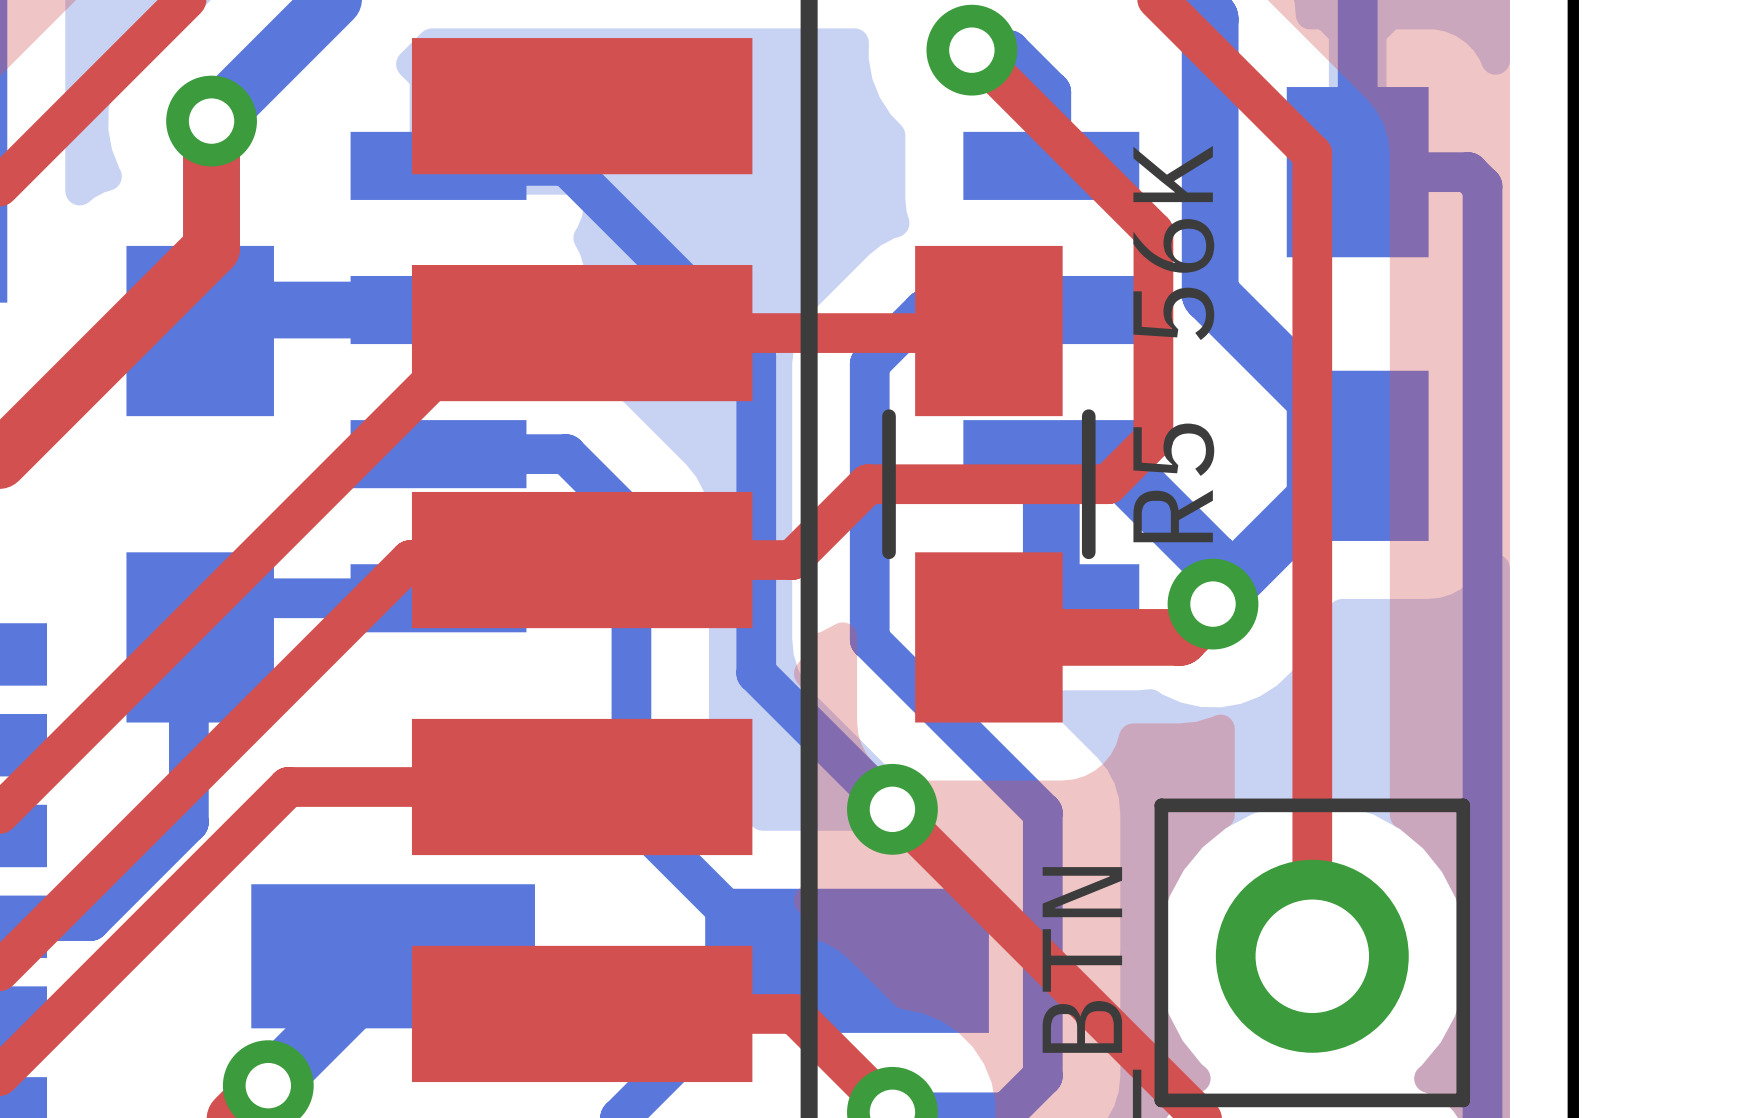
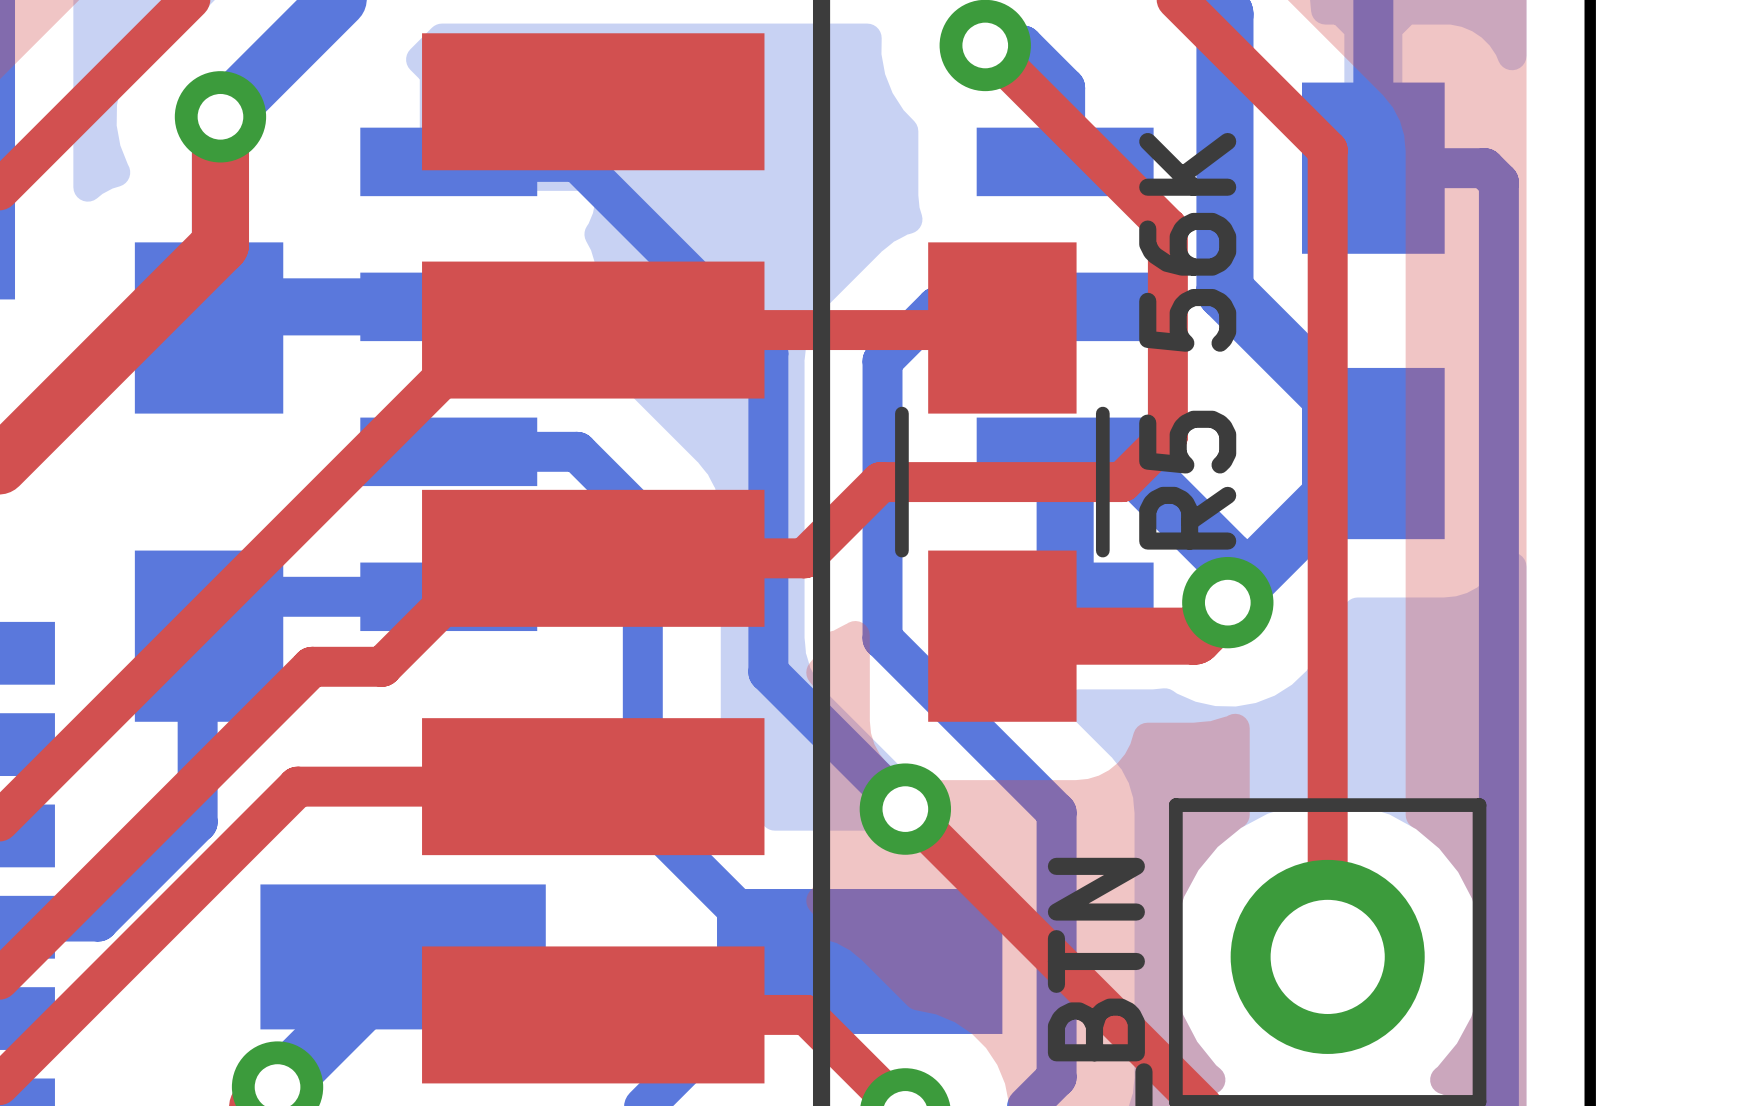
top track: (480, 560) (410, 560) (302, 667) -> (490, 558) (382, 666) (311, 666)

